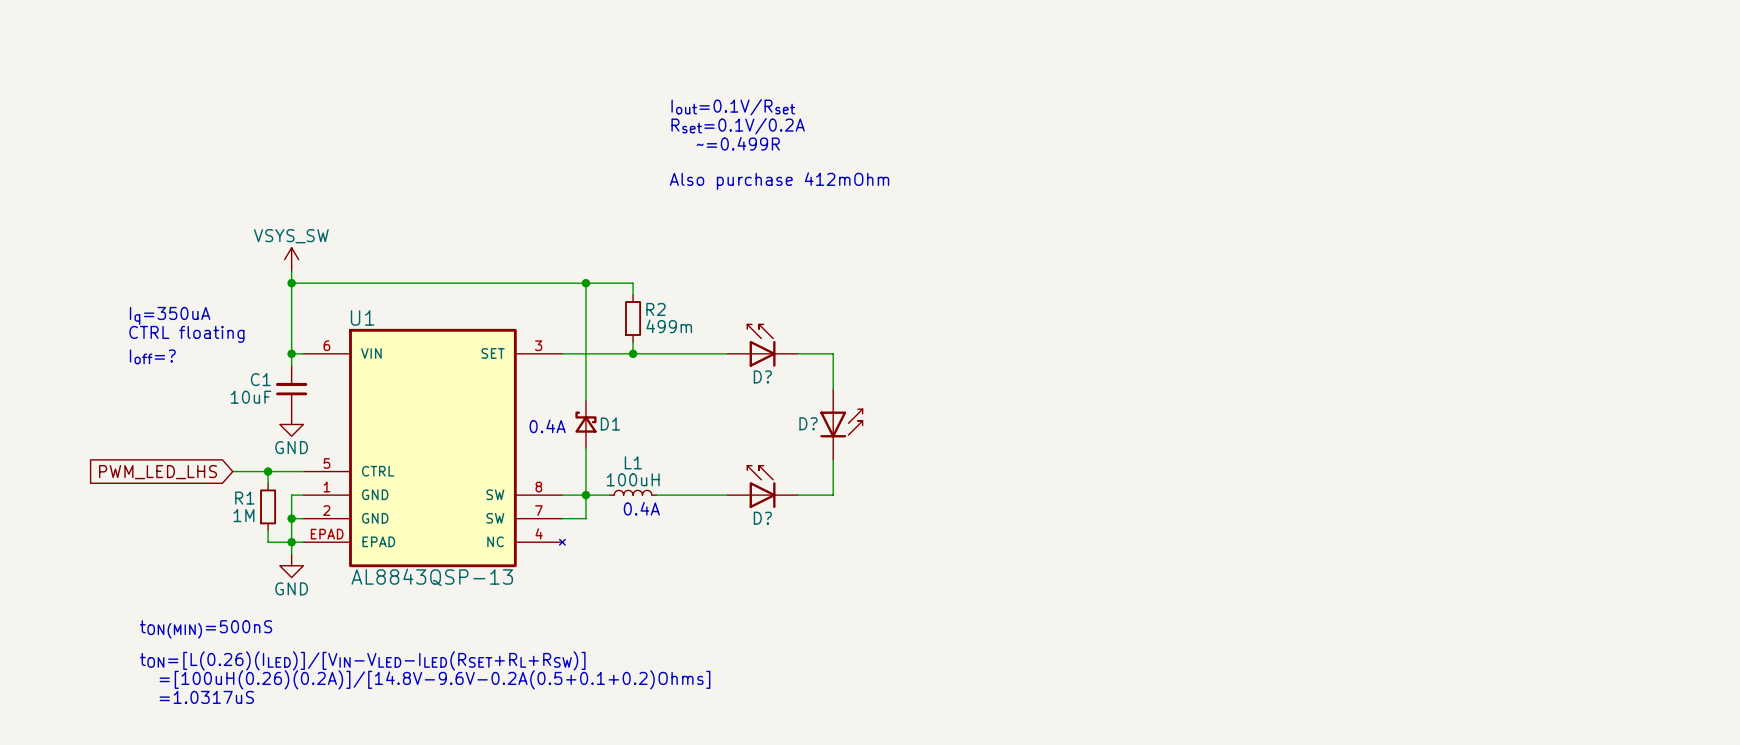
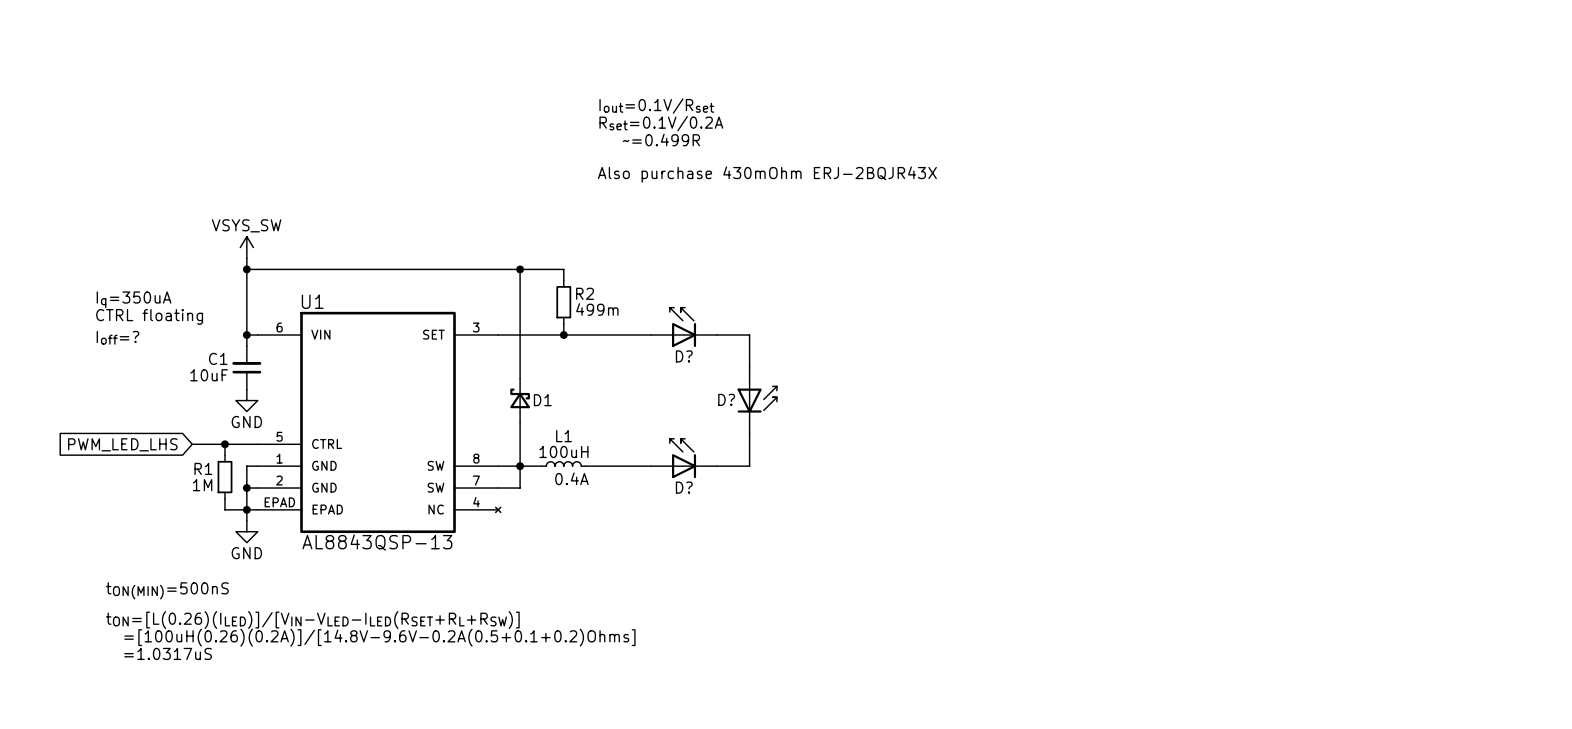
text: Also purchase 412mOhm (779, 181) -> Also purchase 430mOhm ERJ-2BQJR43X (767, 174)
text: 0.4A (547, 426) -> none

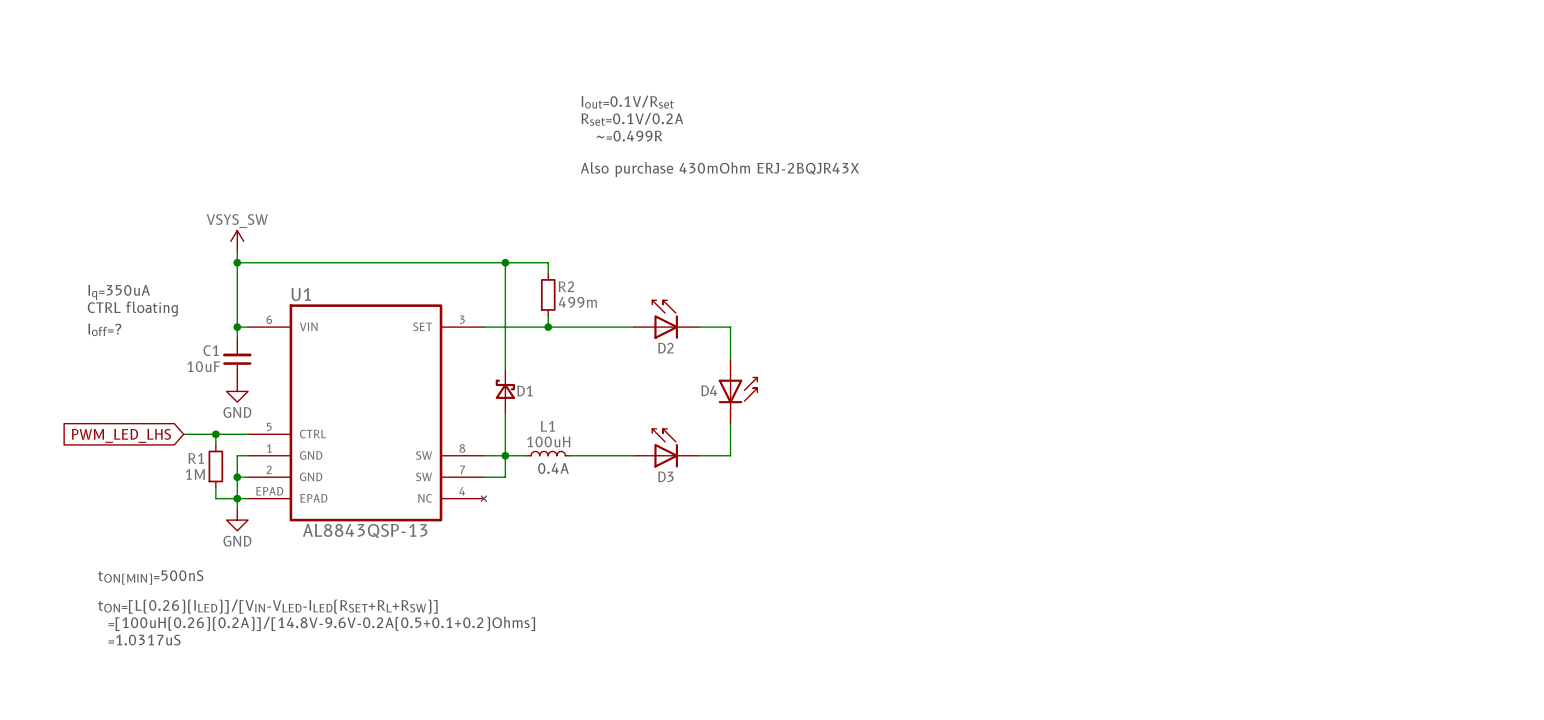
D? name: D? (684, 356) -> D2 (665, 348)
D? name: D? (726, 399) -> D4 (709, 390)
D? name: D? (684, 487) -> D3 (665, 476)

